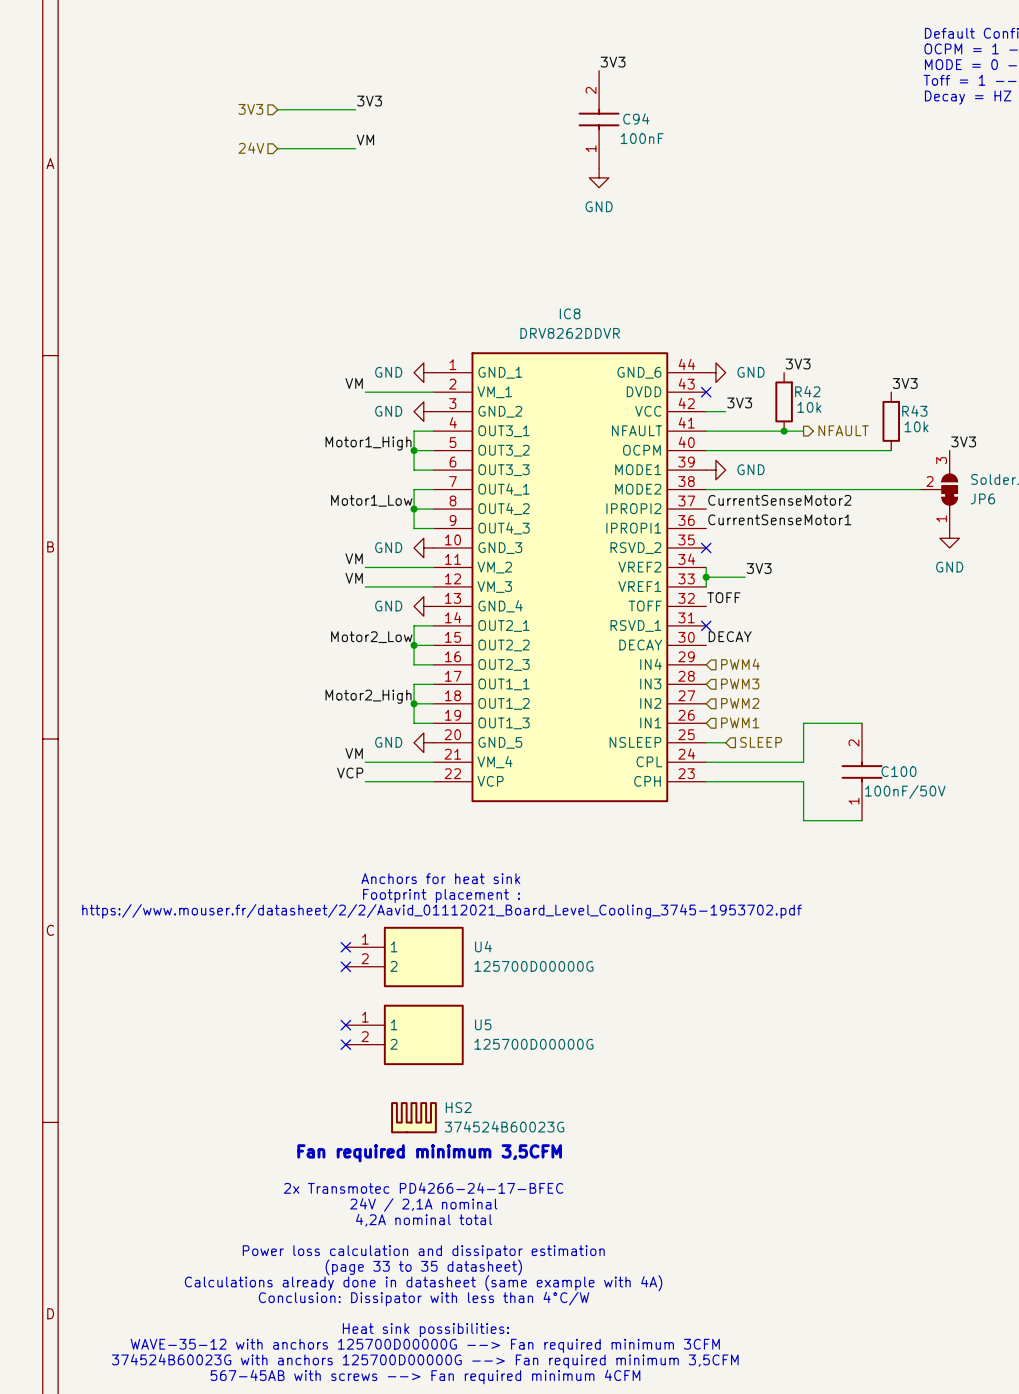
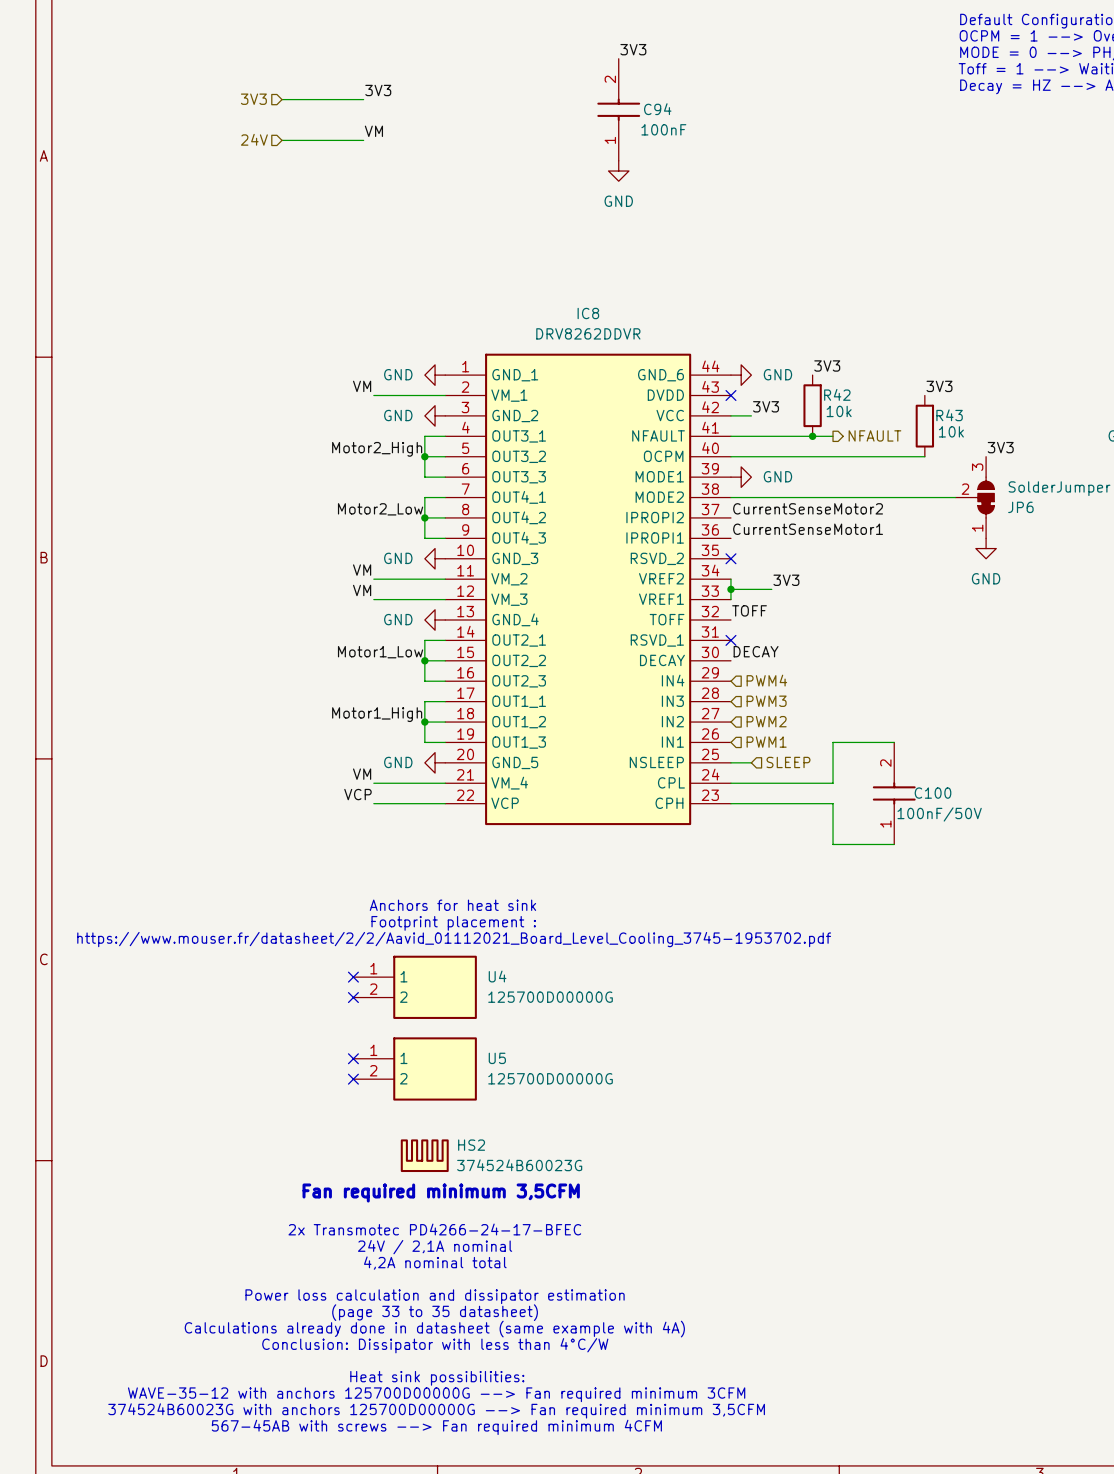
label: Motor1_High (368, 443) -> Motor2_High (377, 449)
label: Motor1_Low (371, 500) -> Motor2_Low (380, 509)
label: Motor2_Low (371, 637) -> Motor1_Low (380, 652)
label: Motor2_High (368, 696) -> Motor1_High (377, 714)

